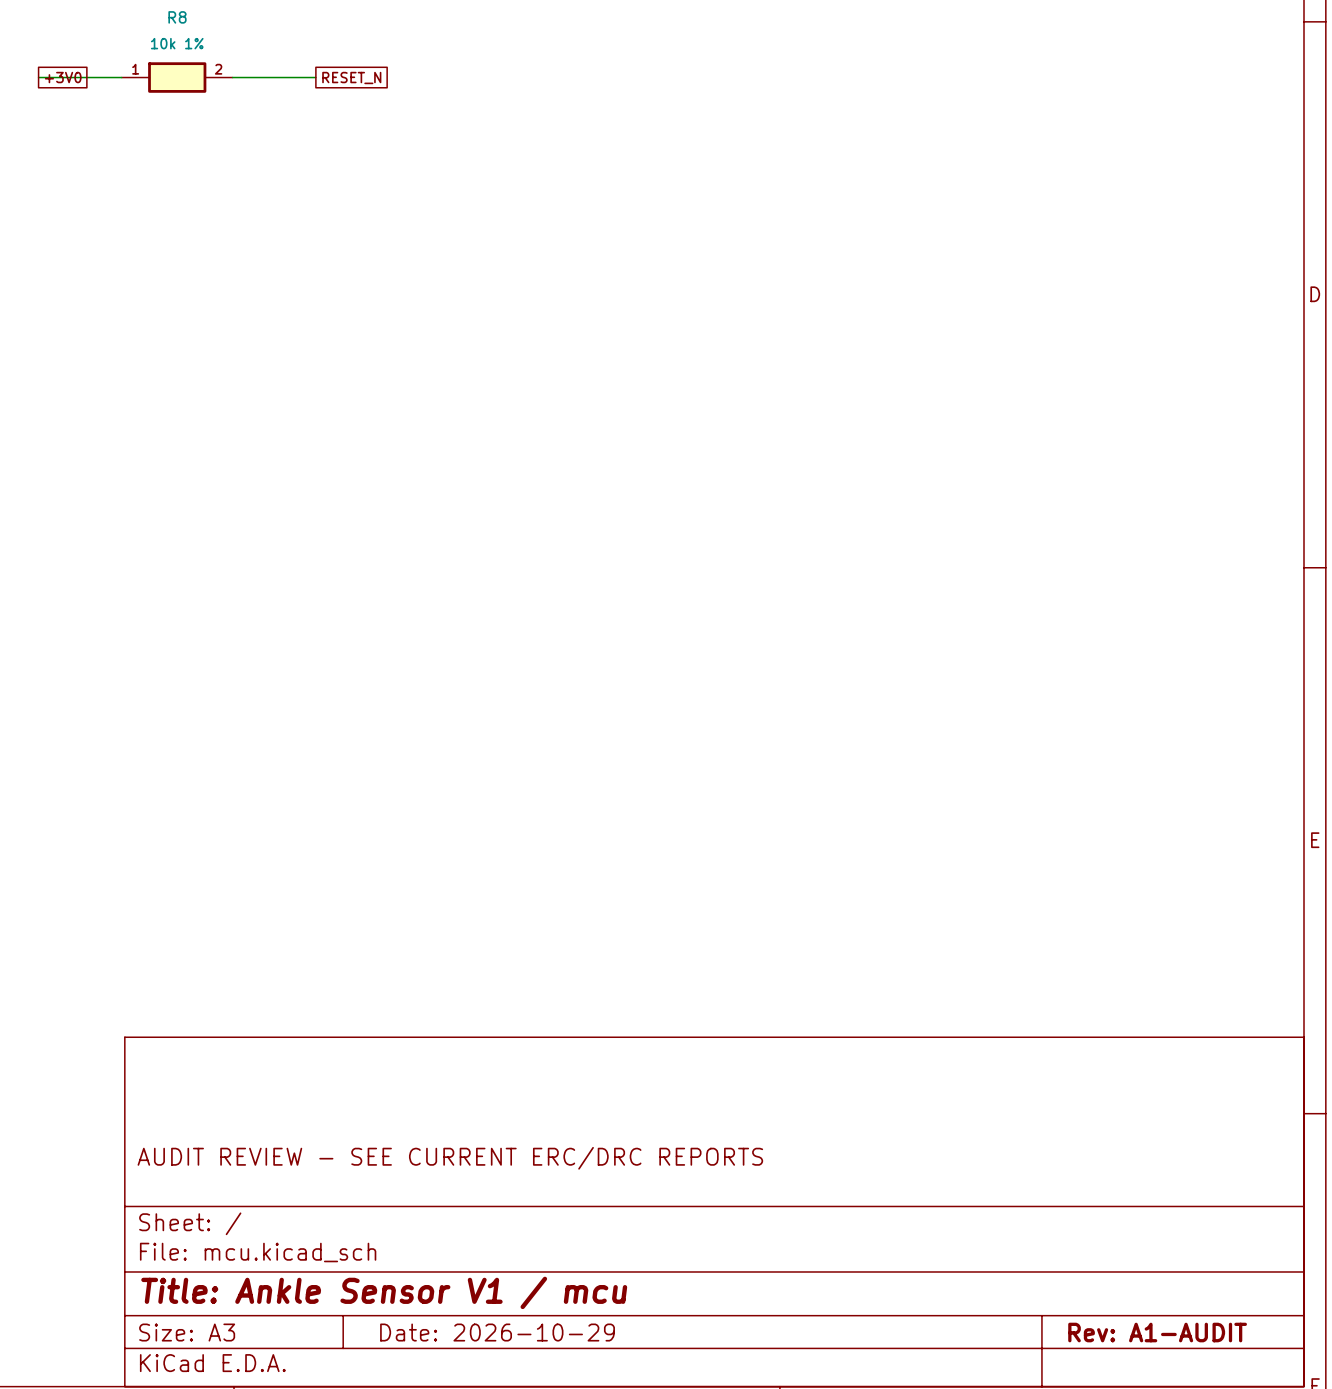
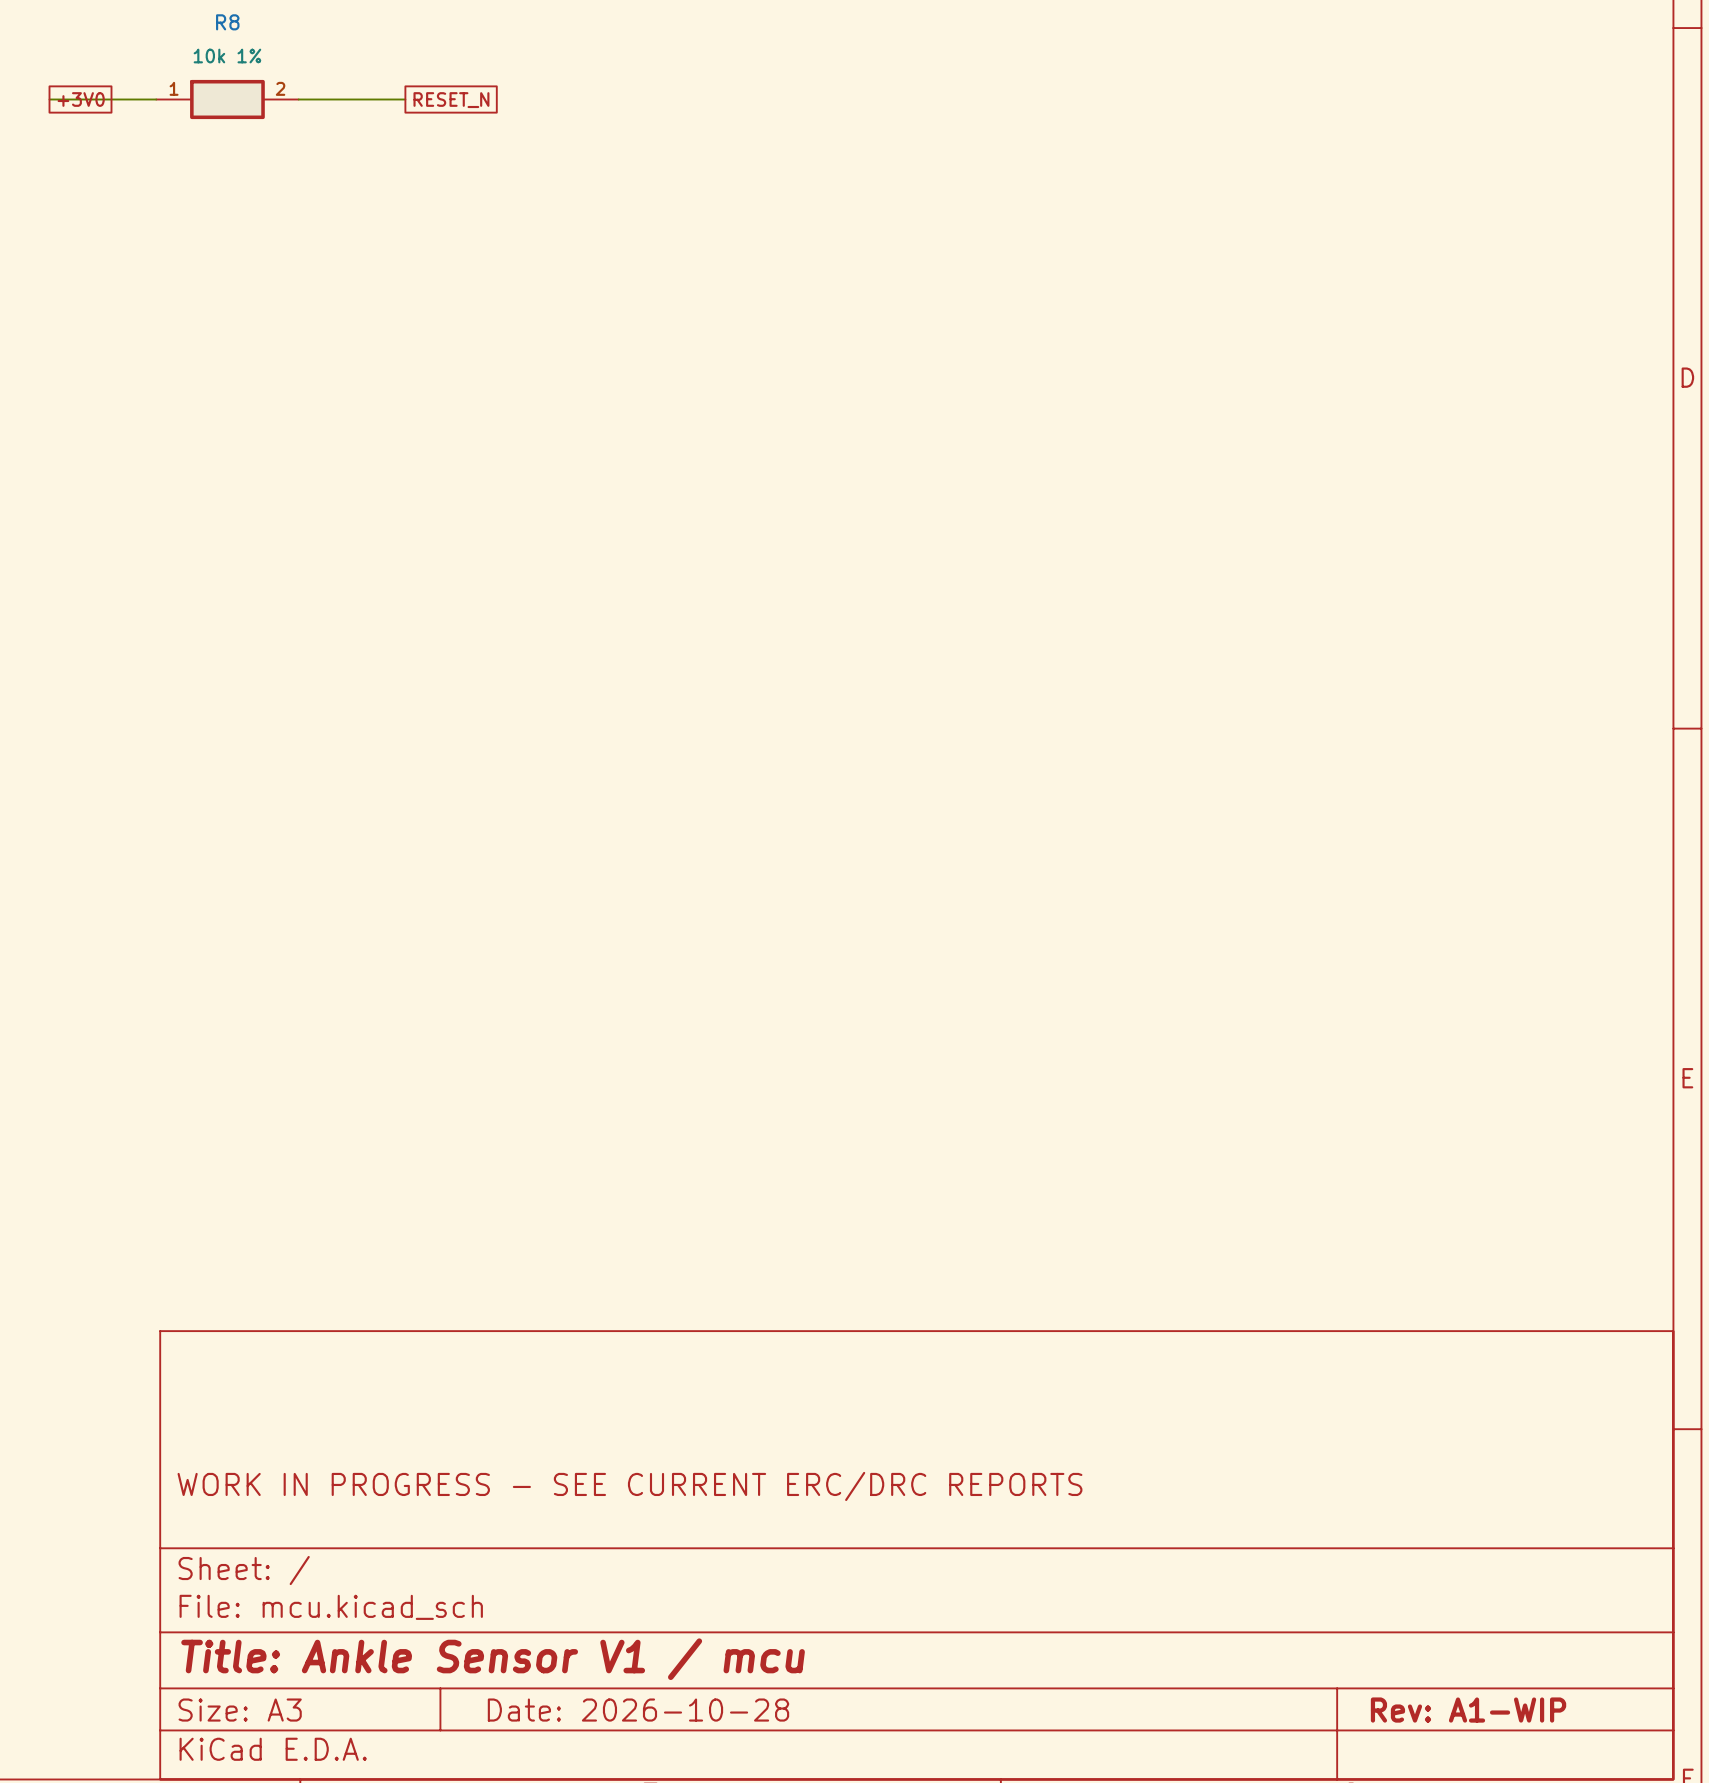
title block: AUDIT REVIEW - SEE CURRENT ERC/DRC REPORTS (450, 1158) -> WORK IN PROGRESS - SEE CURRENT ERC/DRC REPORTS (629, 1486)
title block: Date: 2026-10-29 (497, 1332) -> Date: 2026-10-28 (638, 1710)
title block: Rev: A1-AUDIT (1157, 1332) -> Rev: A1-WIP (1468, 1710)

